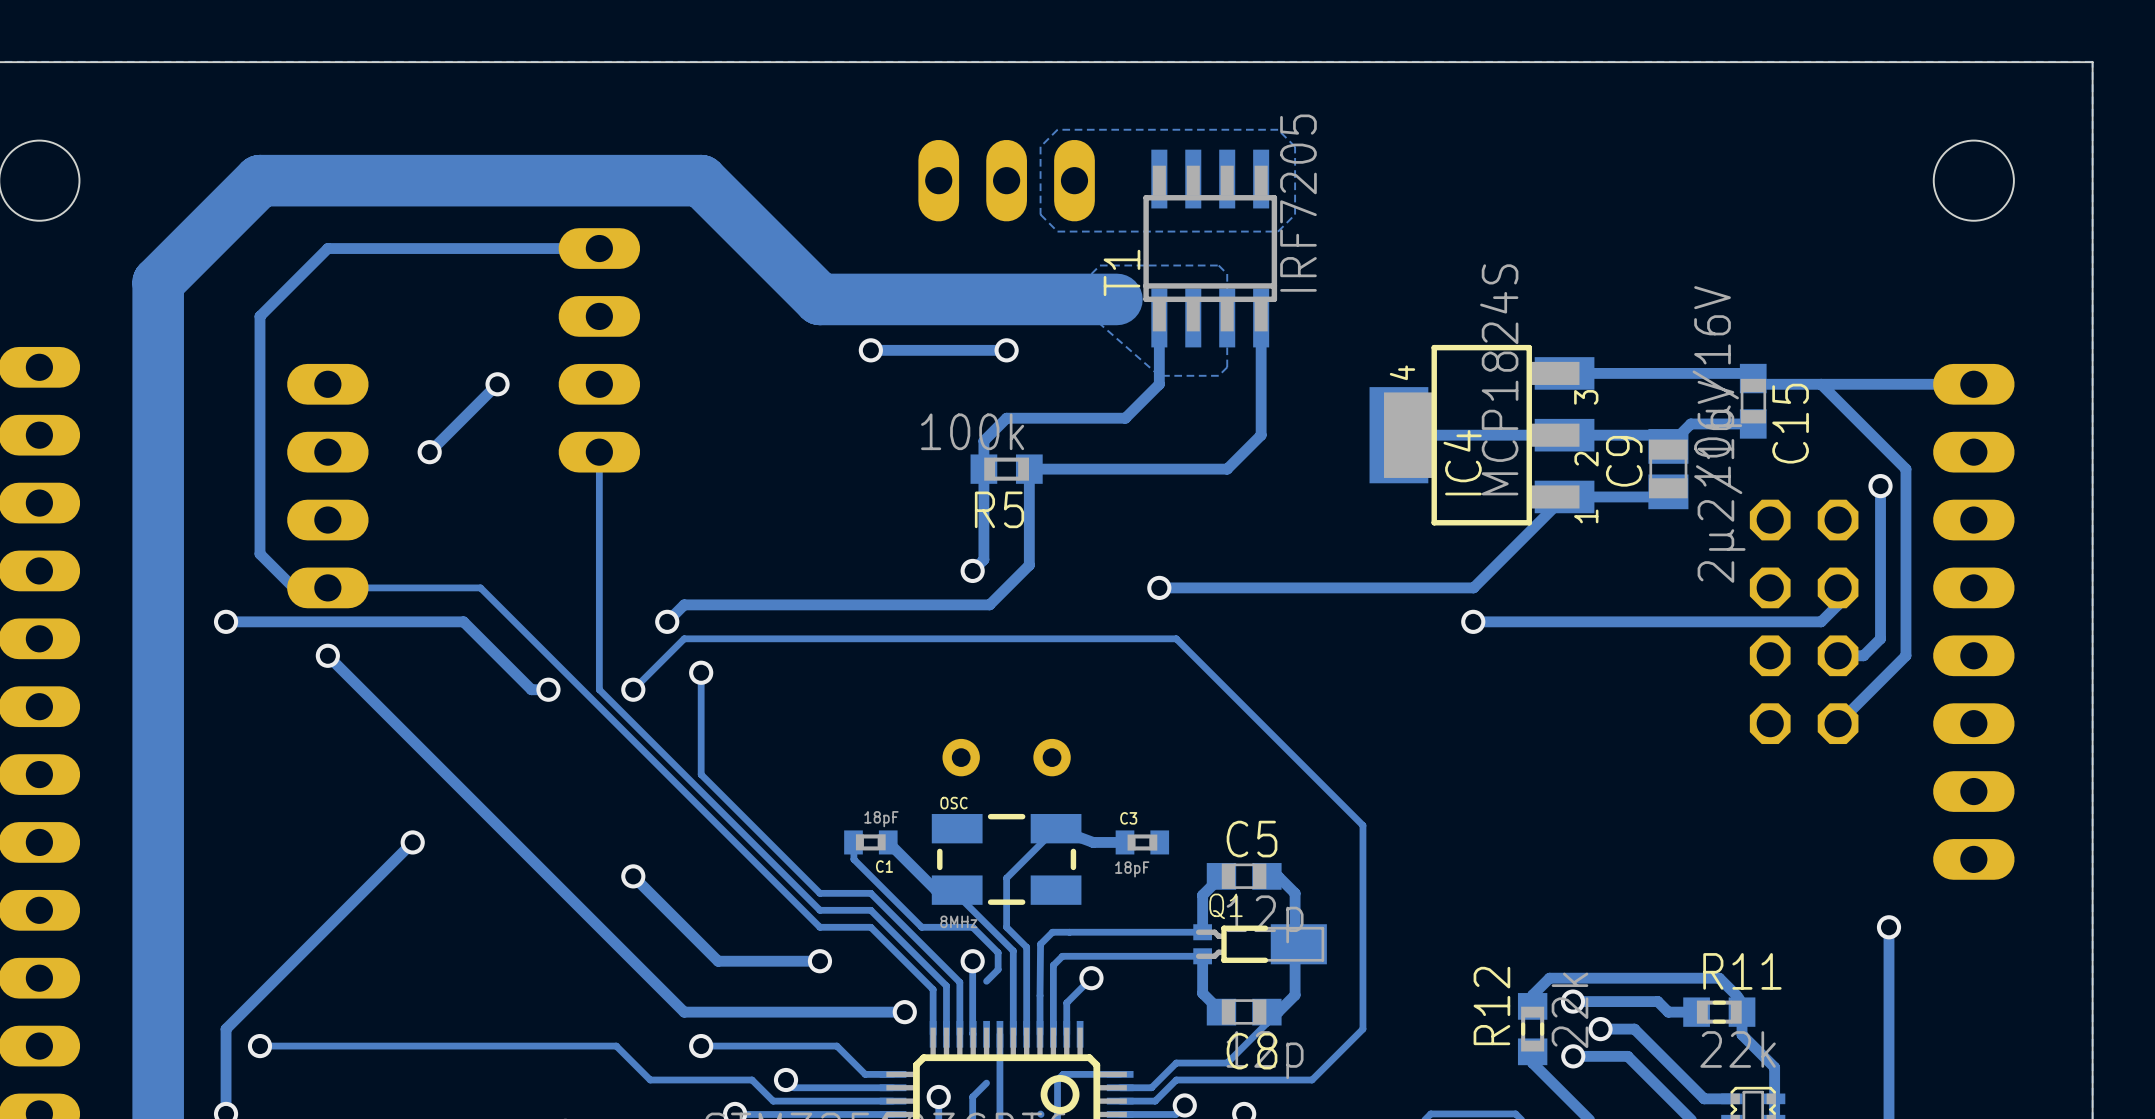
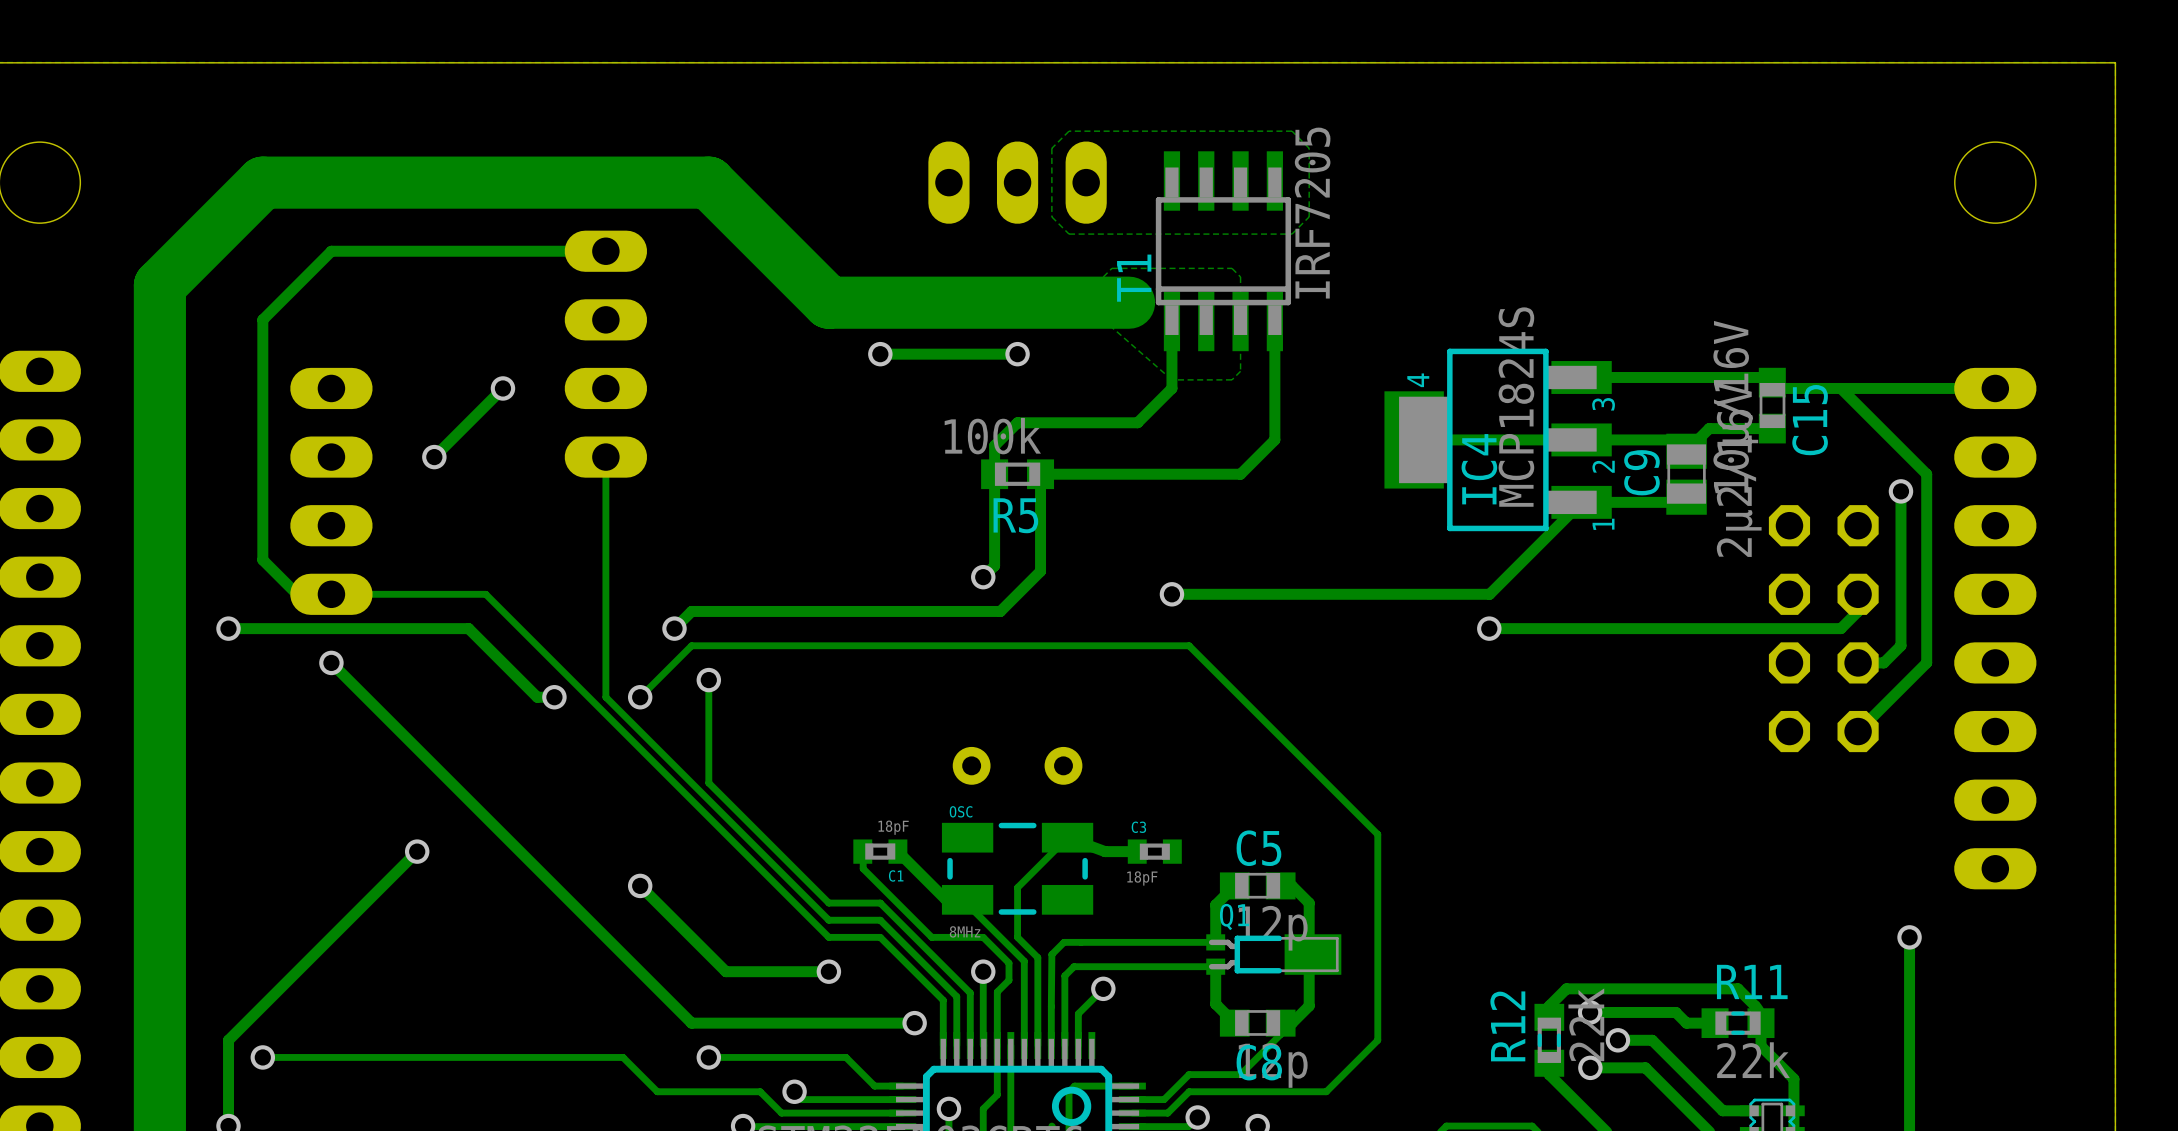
track: none -> (997, 991) (997, 1094)

